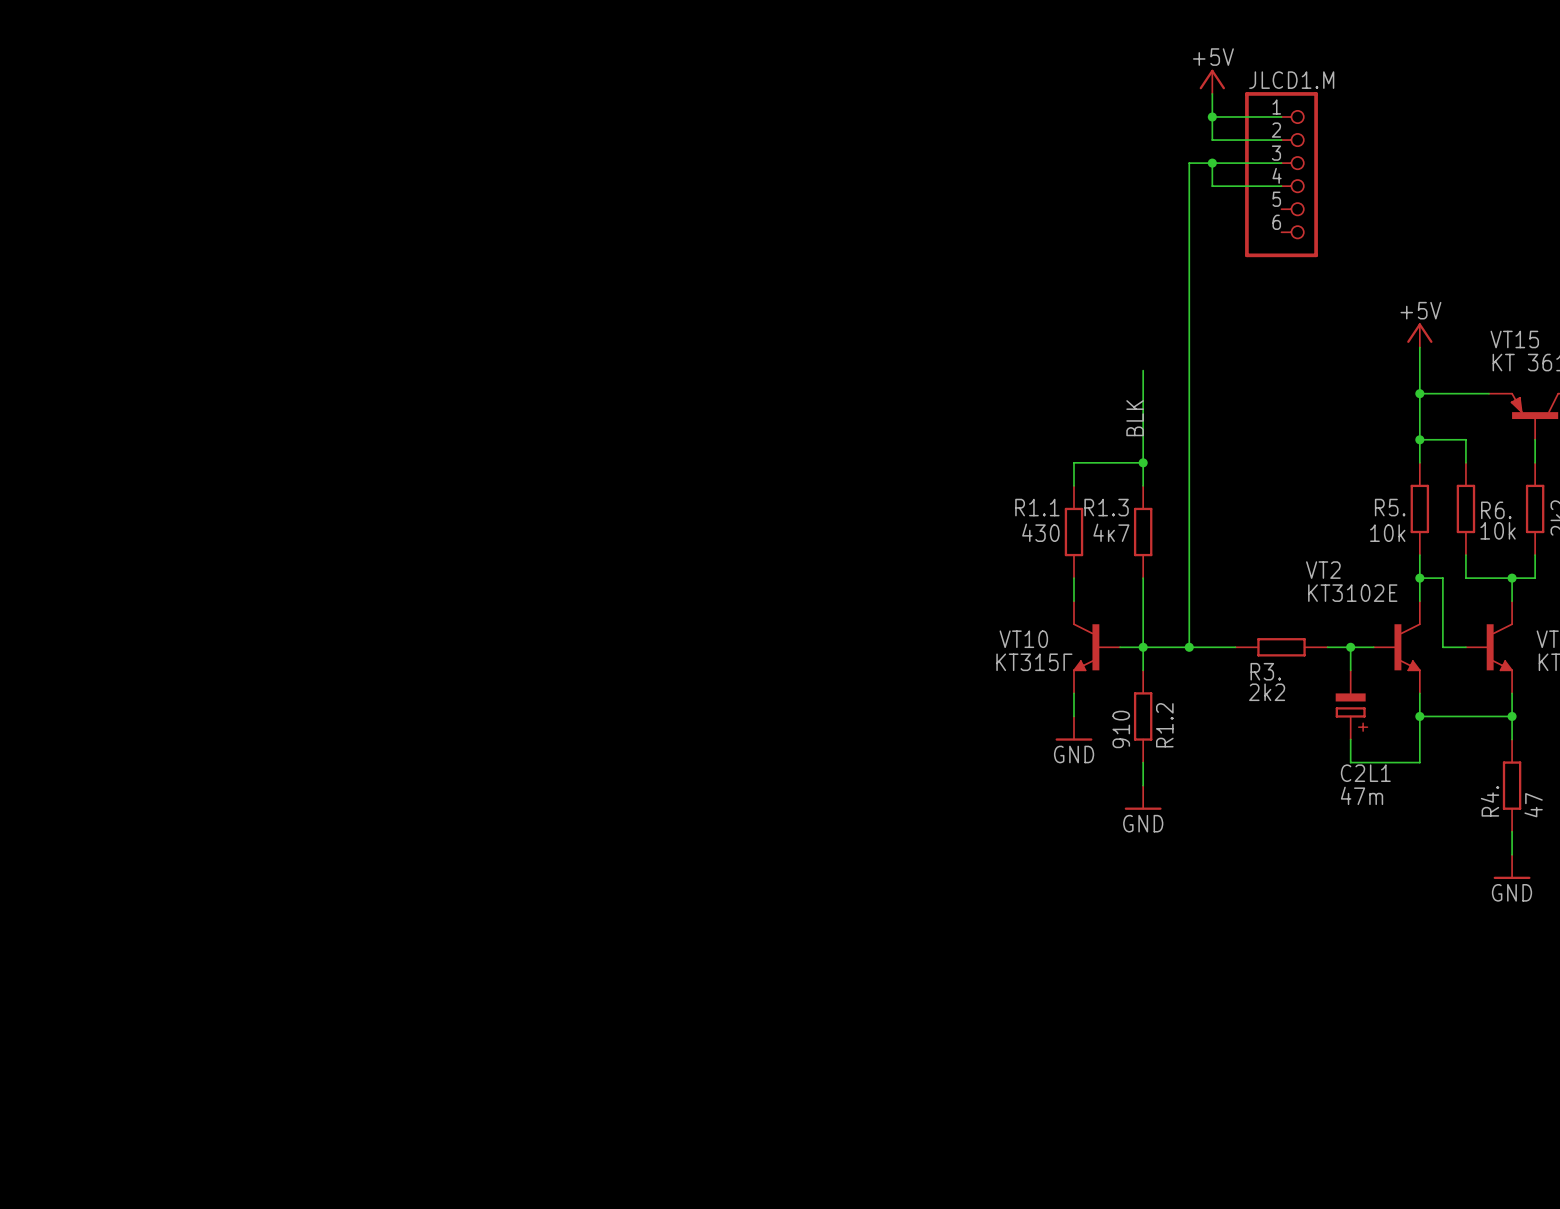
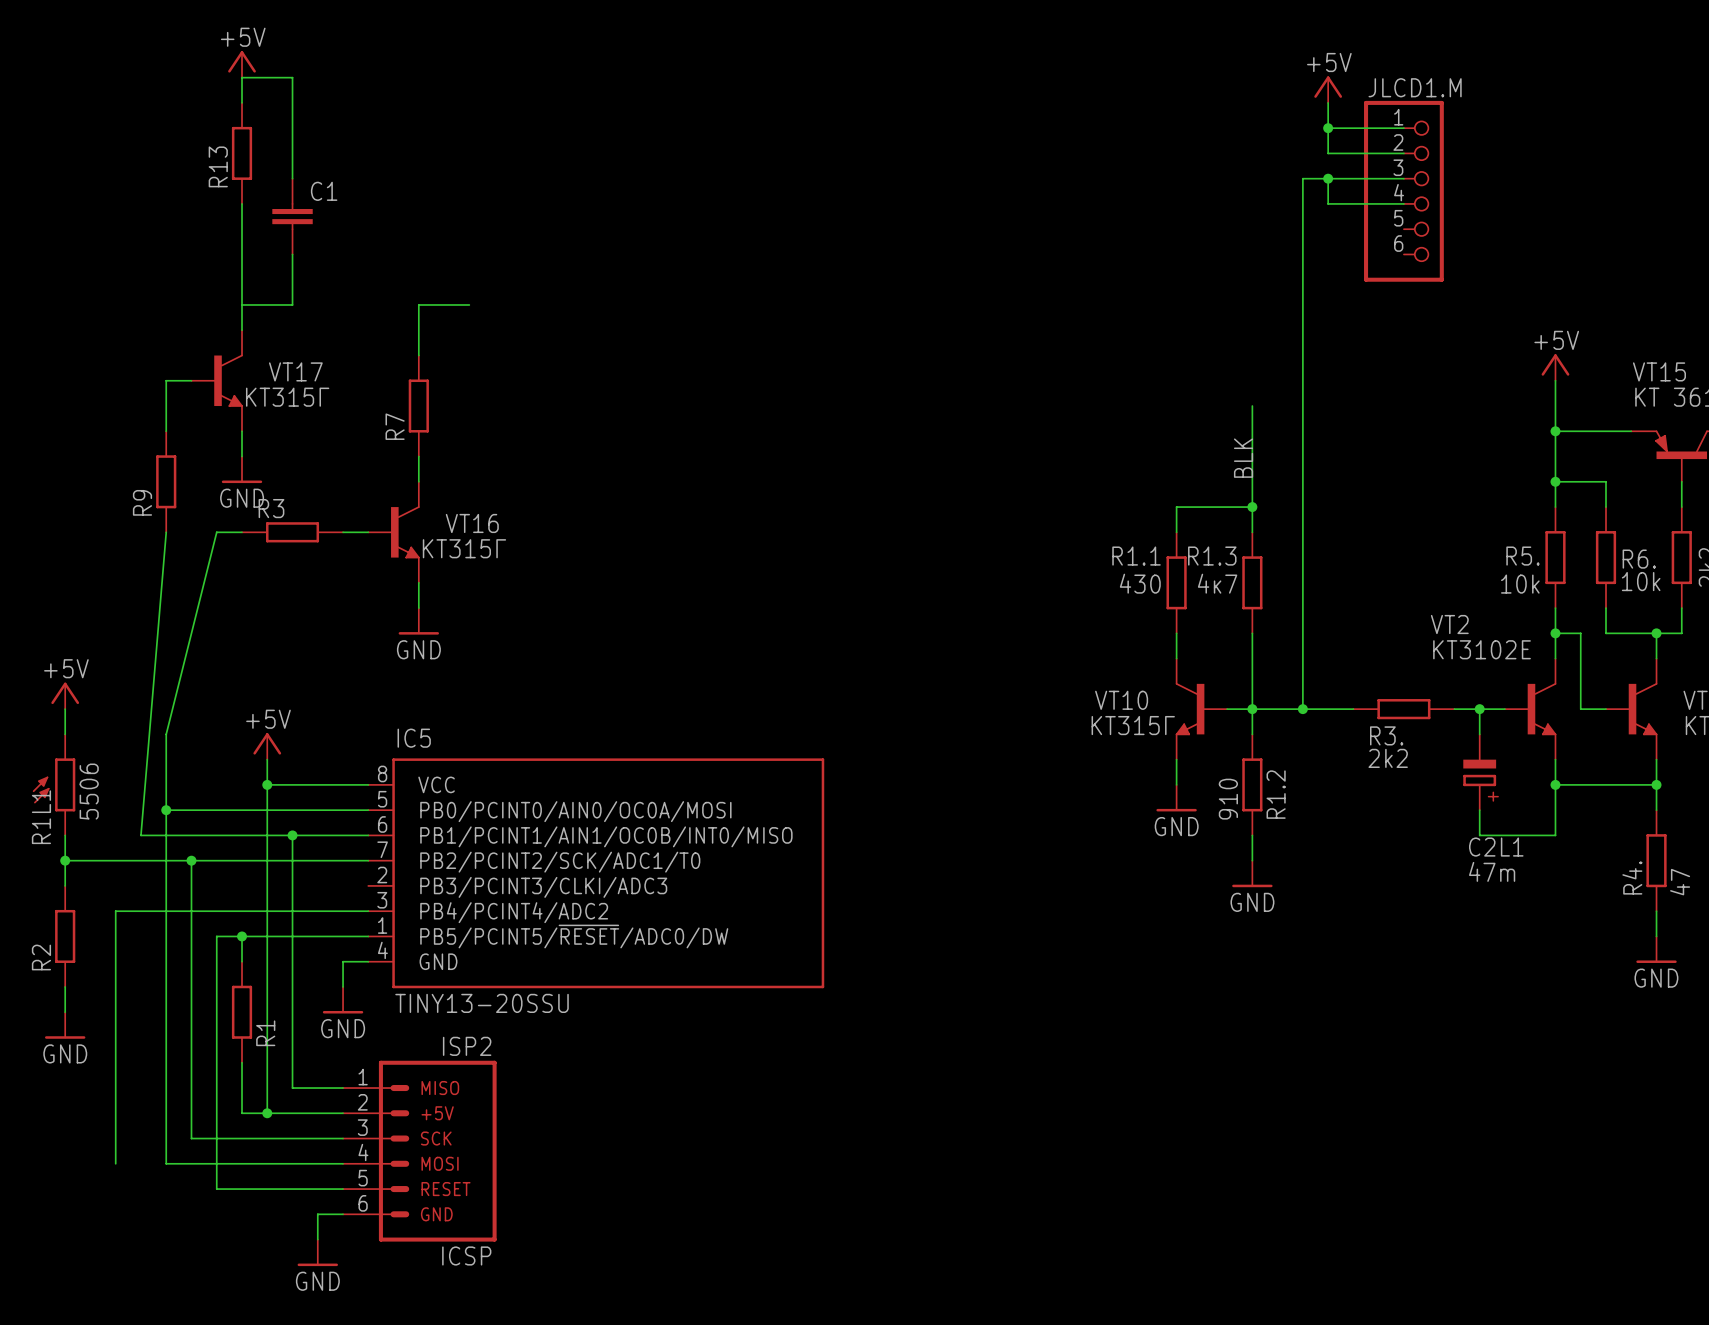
power symbol: none -> +5V (242, 64)
wire: none -> (242, 102) (242, 77) (292, 77) (292, 178)
R13: none -> (242, 153)
wire: none -> (242, 203) (242, 330)
C1: none -> (292, 216)
wire: none -> (292, 254) (292, 304) (242, 304)
wire: none -> (469, 304) (418, 304) (418, 355)
wire: none -> (191, 380) (166, 380) (166, 431)
VT17: none -> КТ315Г (217, 380)
R7: none -> (418, 406)
wire: none -> (242, 431) (242, 456)
wire: none -> (418, 456) (418, 481)
power symbol: none -> GND (242, 469)
R9: none -> (166, 481)
wire: none -> (166, 532) (140, 835) (368, 835)
wire: none -> (242, 532) (216, 532) (166, 734) (166, 1163) (343, 1163)
R3: none -> (292, 532)
wire: none -> (343, 532) (368, 532)
VT16: none -> КТ315Г (393, 532)
wire: none -> (418, 582) (418, 608)
power symbol: none -> GND (418, 621)
power symbol: none -> +5V (65, 695)
wire: none -> (65, 709) (65, 734)
power symbol: none -> +5V (267, 746)
wire: none -> (267, 759) (267, 1113)
R1L1: none -> 5506 (54, 784)
wire: none -> (267, 784) (368, 784)
junction: none -> (267, 784)
wire: none -> (166, 810) (368, 810)
junction: none -> (166, 810)
wire: none -> (65, 835) (65, 885)
wire: none -> (292, 835) (292, 1088) (343, 1088)
junction: none -> (292, 835)
wire: none -> (65, 860) (368, 860)
junction: none -> (65, 860)
wire: none -> (191, 860) (191, 1138) (343, 1138)
junction: none -> (191, 860)
IC5: none -> TINY13-20SSU (596, 873)
wire: none -> (368, 911) (115, 911) (115, 1163)
R2: none -> (65, 936)
wire: none -> (242, 936) (242, 961)
junction: none -> (242, 936)
wire: none -> (368, 936) (216, 936) (216, 1189) (343, 1189)
wire: none -> (368, 961) (343, 961) (343, 986)
wire: none -> (65, 986) (65, 1012)
power symbol: none -> GND (343, 1000)
R1: none -> (242, 1012)
power symbol: none -> GND (65, 1025)
wire: none -> (242, 1062) (242, 1113) (343, 1113)
junction: none -> (267, 1113)
ISP2: none -> (419, 1151)
wire: none -> (343, 1214) (317, 1214) (317, 1239)
power symbol: none -> GND (317, 1252)

